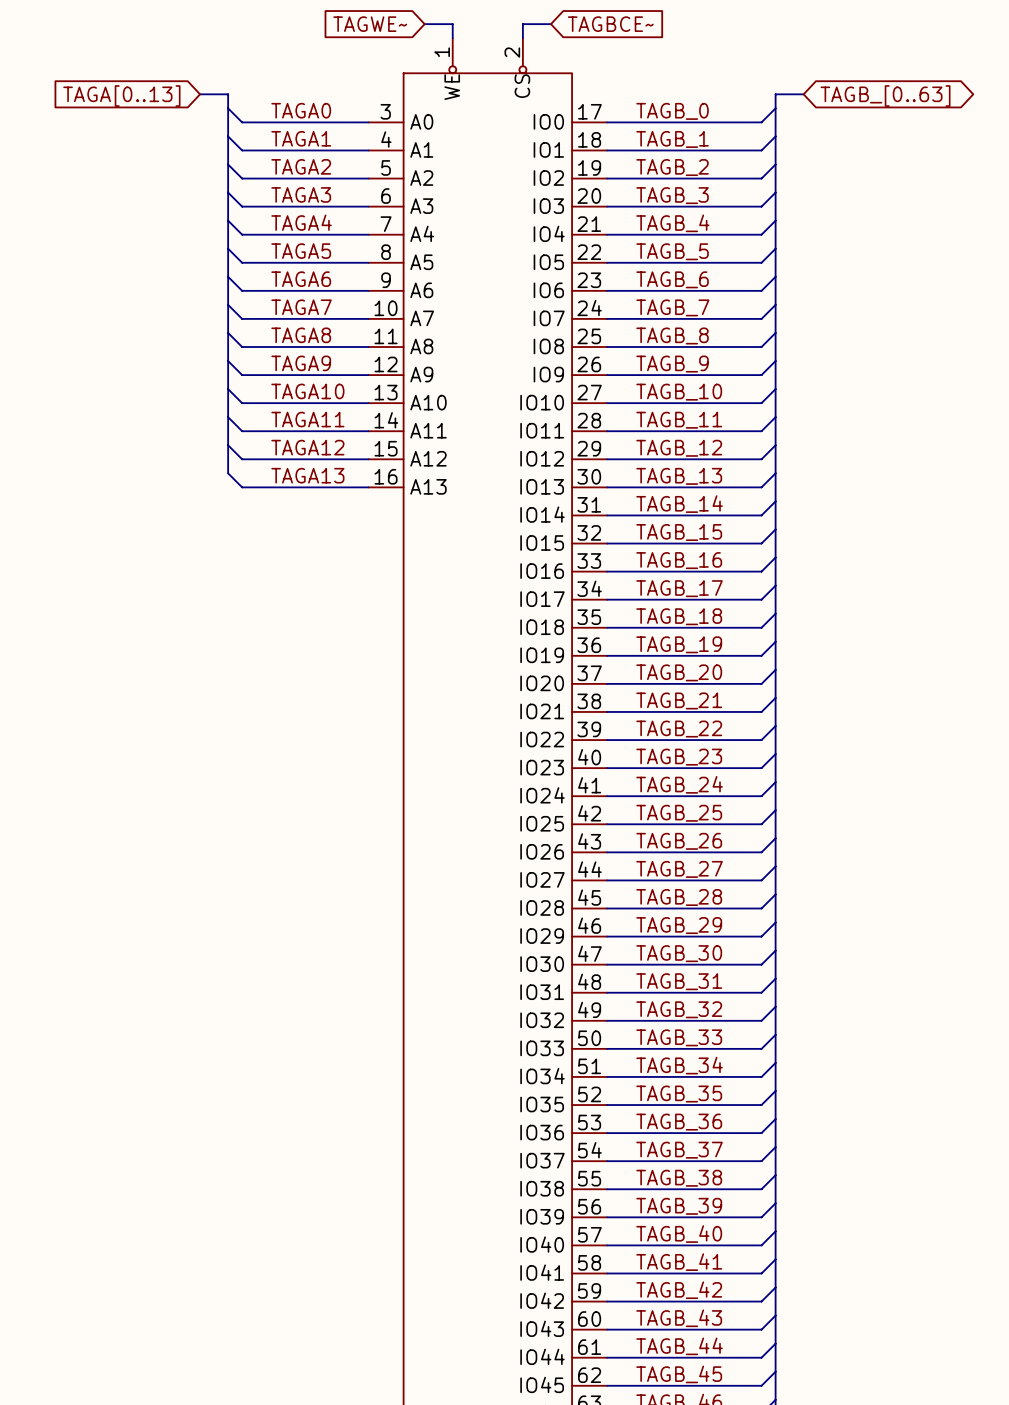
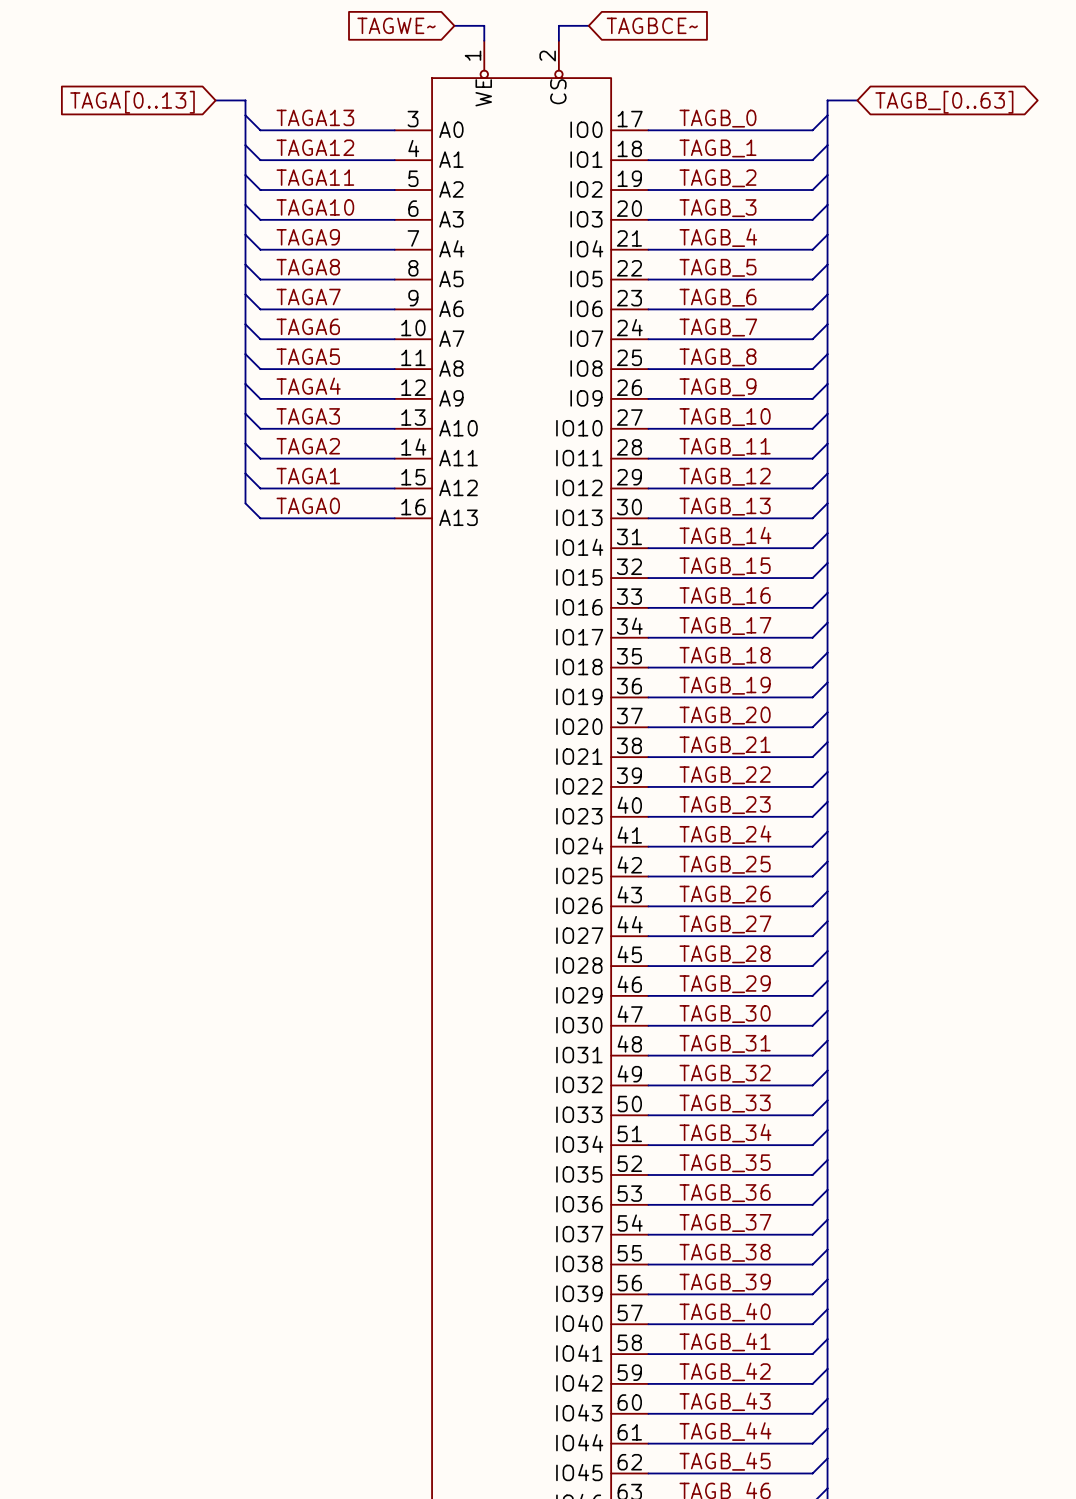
label: TAGA0 (301, 110) -> TAGA13 (315, 117)
label: TAGA1 (301, 138) -> TAGA12 (315, 147)
label: TAGA2 (301, 166) -> TAGA11 (315, 177)
label: TAGA3 (301, 194) -> TAGA10 (315, 207)
label: TAGA4 (301, 222) -> TAGA9 (308, 237)
label position: TAGA5 (301, 251) -> TAGA5 (308, 356)
label position: TAGA6 (301, 279) -> TAGA6 (308, 326)
label position: TAGA7 (301, 307) -> TAGA7 (308, 296)
label position: TAGA8 (301, 335) -> TAGA8 (308, 267)
label: TAGA9 (301, 363) -> TAGA4 (308, 386)
label: TAGA10 (307, 391) -> TAGA3 (308, 416)
label: TAGA11 (307, 419) -> TAGA2 (308, 446)
label: TAGA12 (307, 447) -> TAGA1 (308, 476)
label: TAGA13 (307, 475) -> TAGA0 (308, 505)

